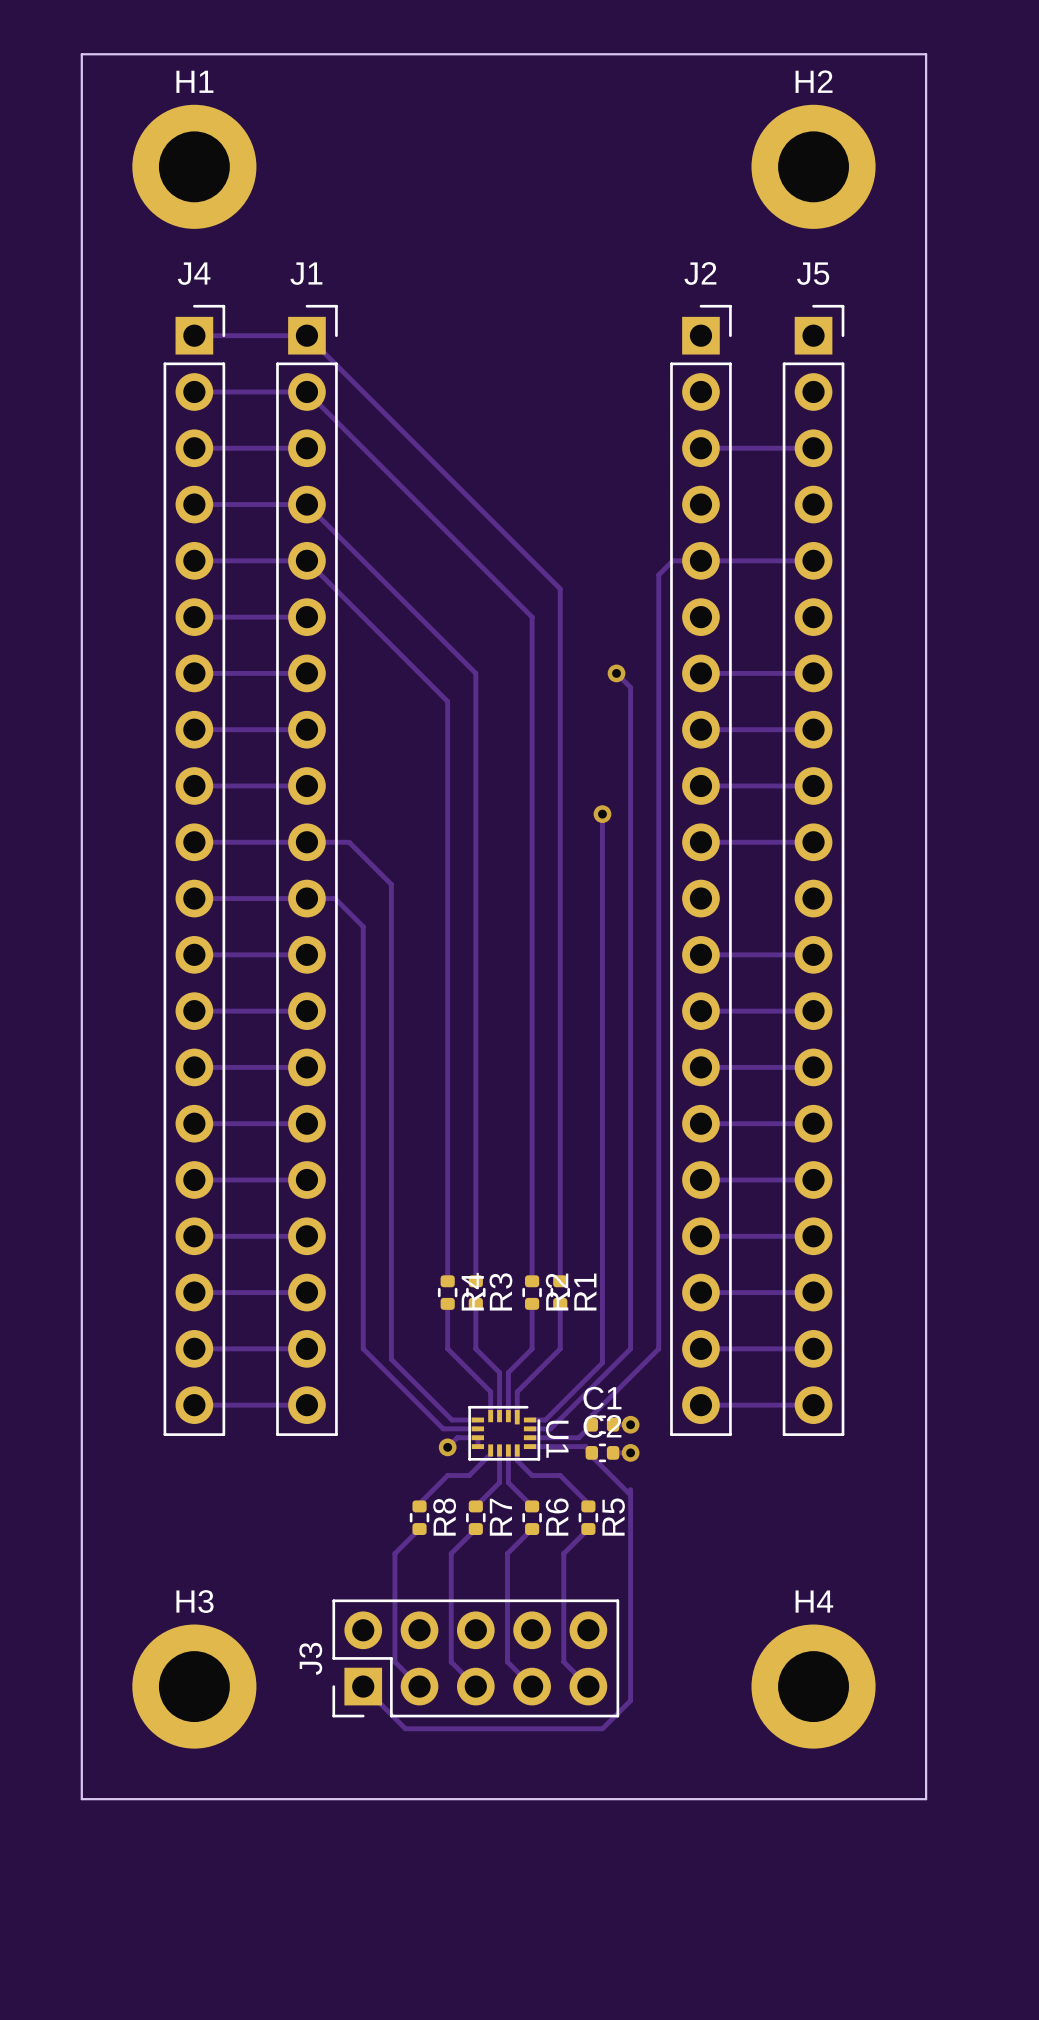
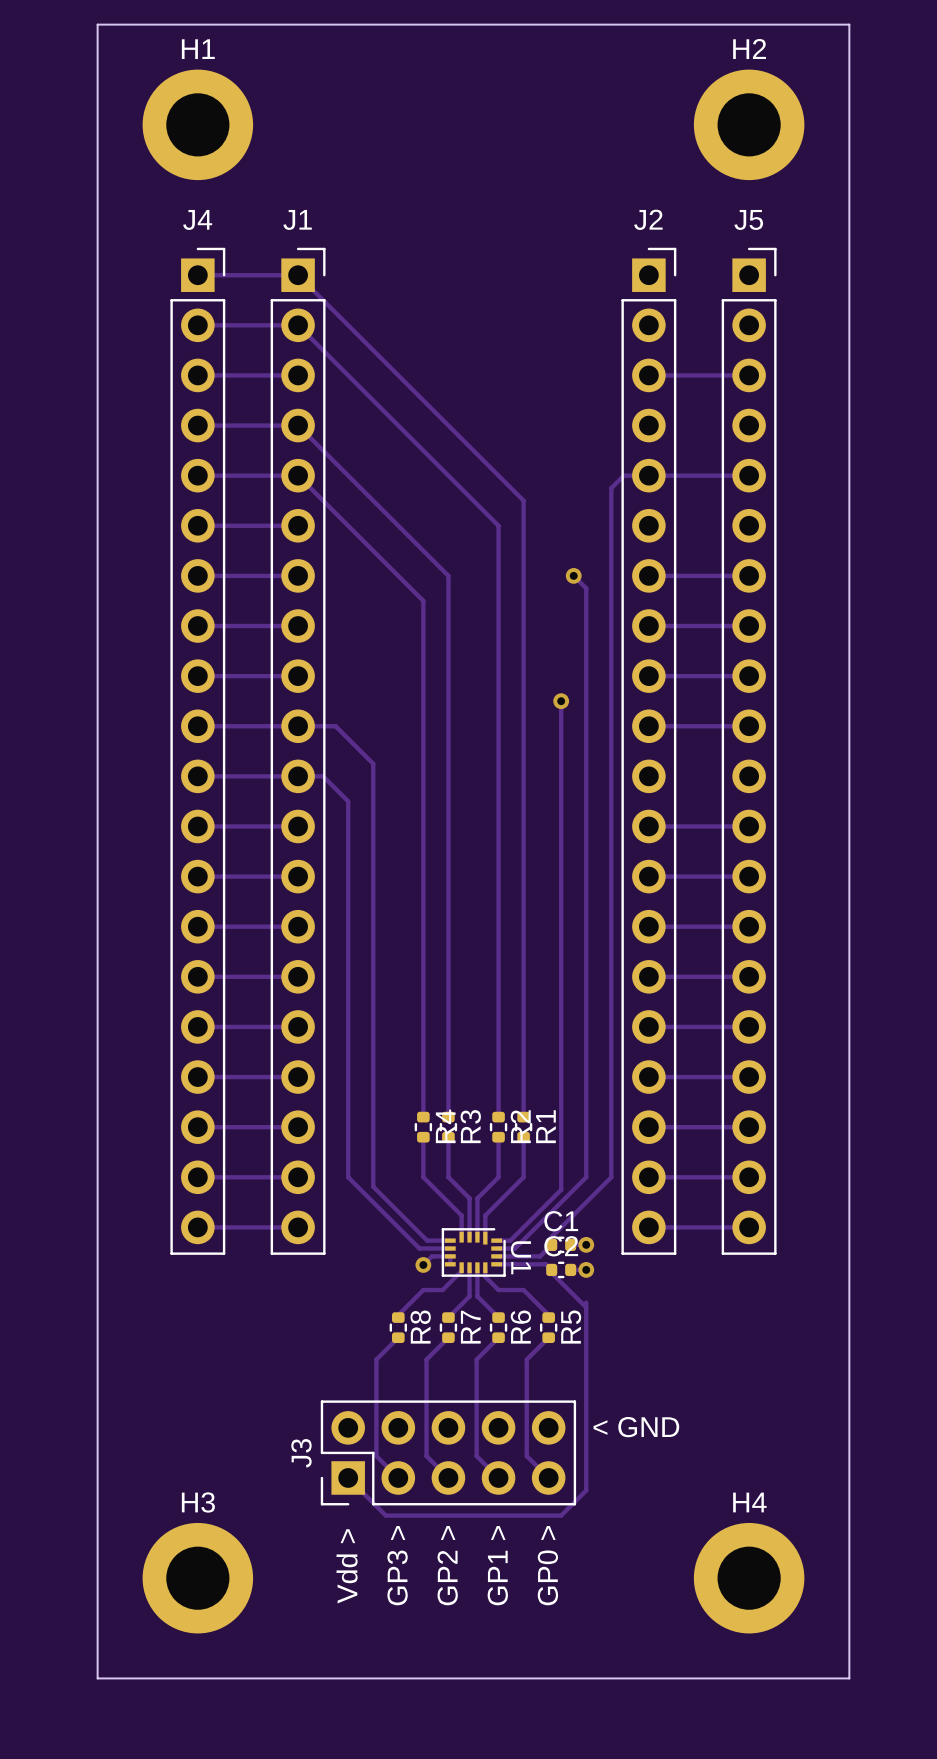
text: none -> < GND (636, 1427)
H3 position: (194, 1686) -> (197, 1578)
H4 position: (813, 1686) -> (749, 1578)
text: none -> Vdd > (347, 1566)
text: none -> GP3 > (397, 1565)
text: none -> GP2 > (447, 1565)
text: none -> GP1 > (497, 1565)
text: none -> GP0 > (547, 1565)
board edge: (81, 1799) (926, 1799) -> (97, 1578) (97, 1678) (849, 1678) (849, 1578)

